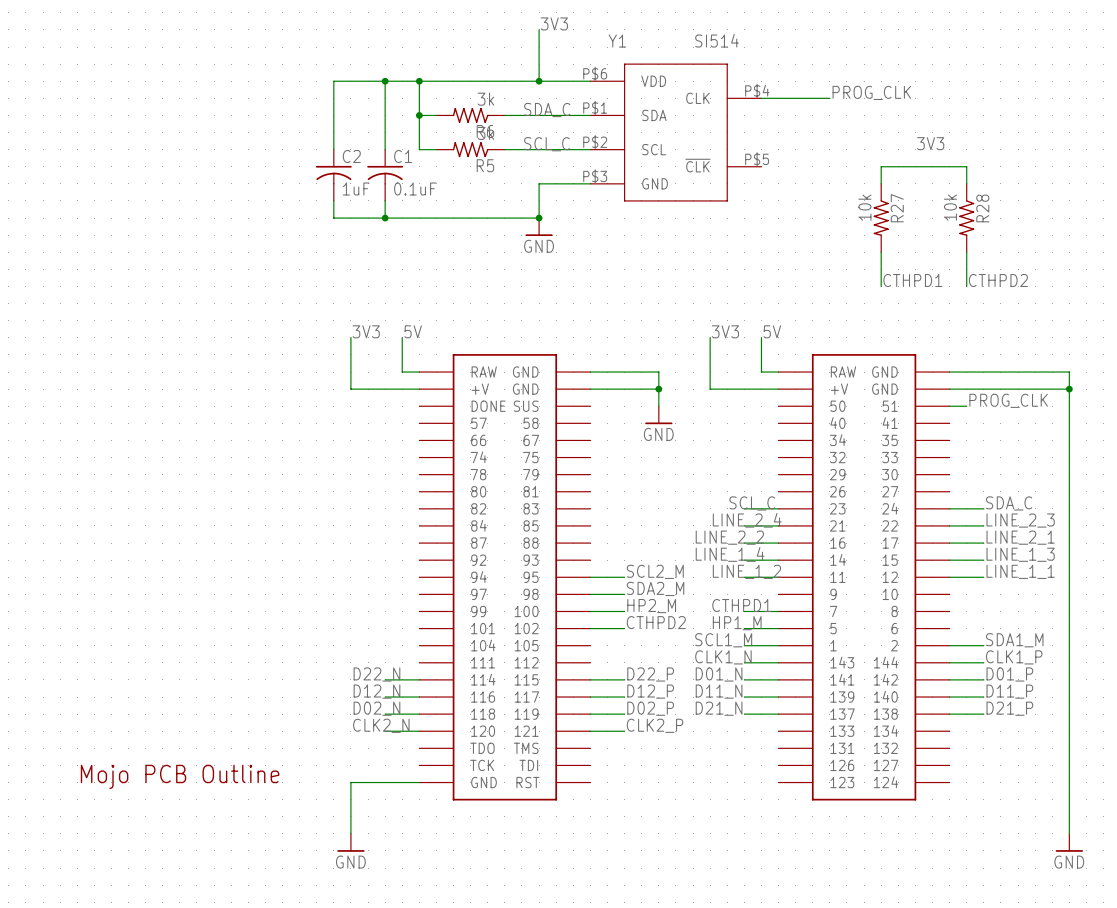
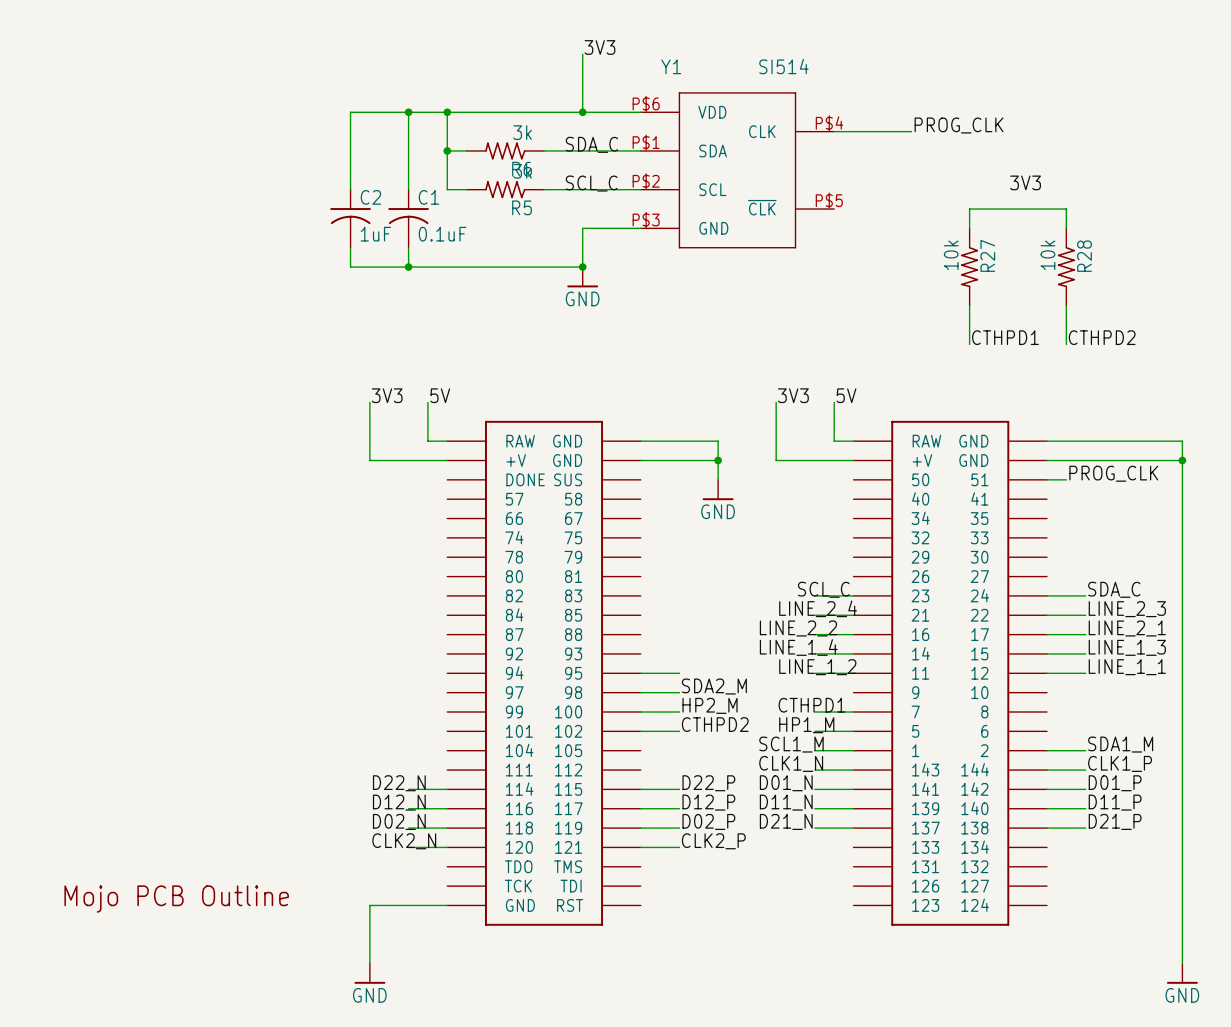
label: SCL2_M (655, 571) -> none

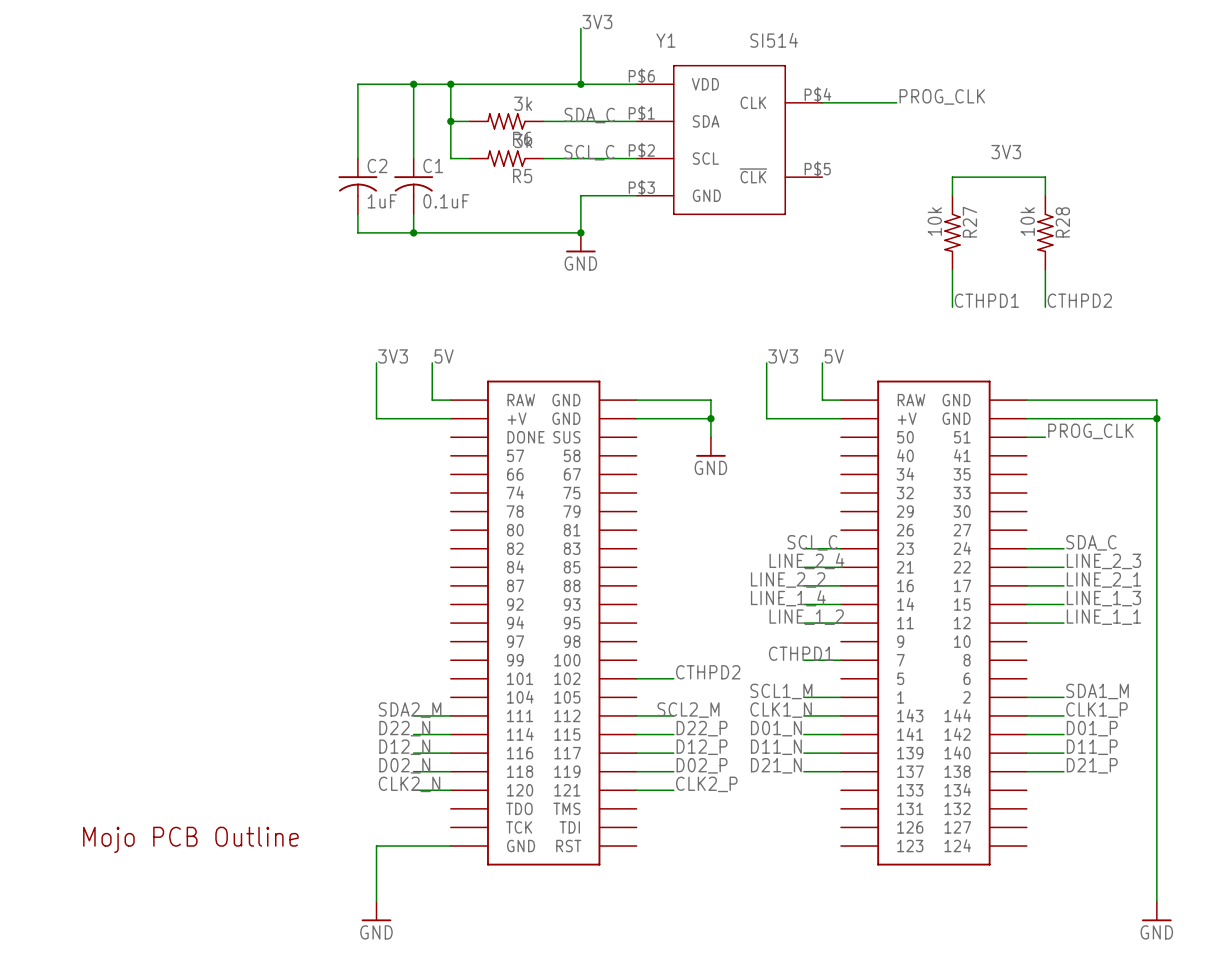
wire: (640, 673) (679, 673) -> none
label: SDA2_M (714, 686) -> none
wire: (640, 692) (679, 692) -> none
label: HP2_M (710, 705) -> none
wire: (640, 712) (679, 712) -> (636, 715) (673, 715)
label: HP1_M (806, 725) -> none
wire: (814, 731) (853, 731) -> none
label: none -> SDA2_M (410, 710)
label: none -> SCL2_M (688, 710)
wire: none -> (413, 715) (450, 715)

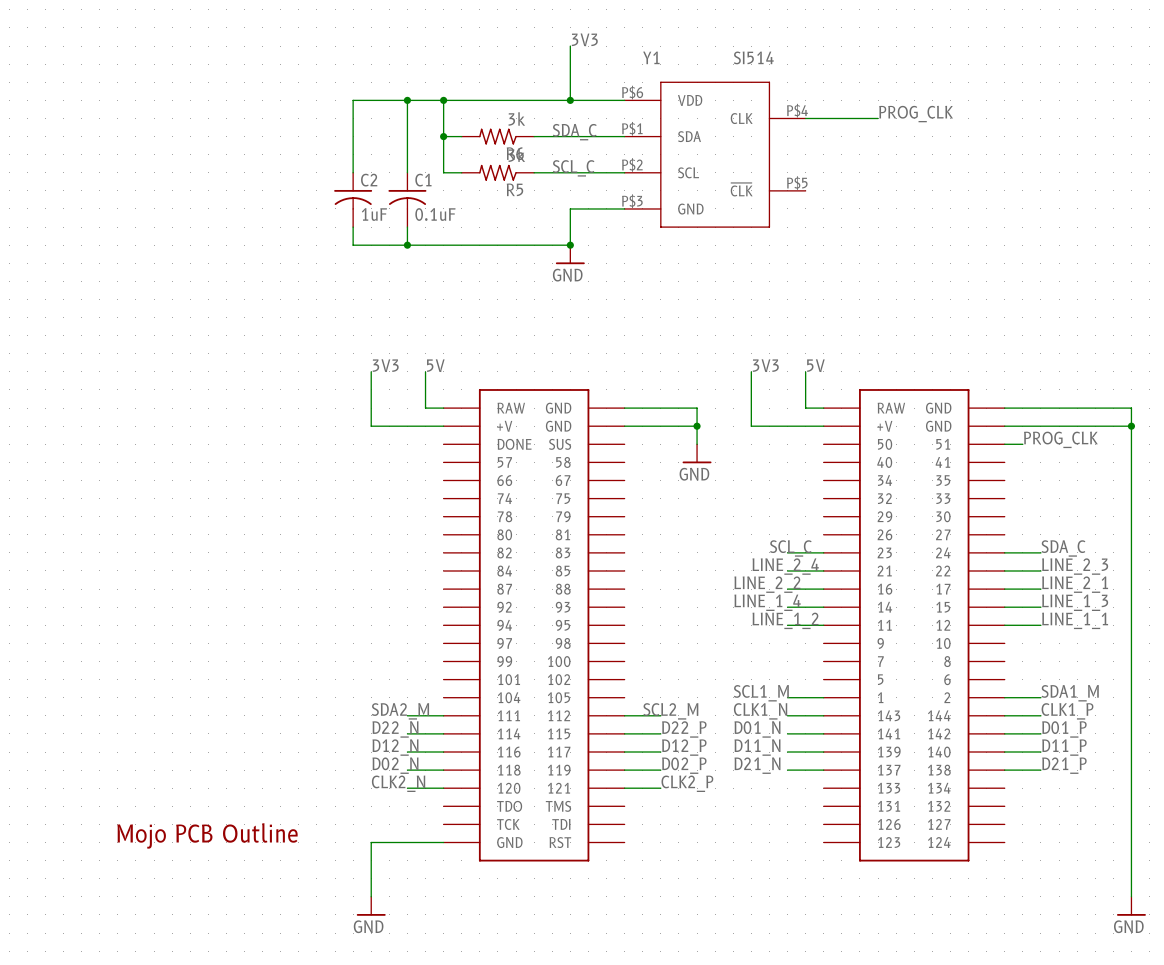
label: 3V3 (1006, 152) -> none
wire: (952, 195) (952, 177) (1045, 177) (1045, 195) -> none
R27: 10k (952, 232) -> none
R28: 10k (1045, 232) -> none
wire: (952, 270) (952, 307) -> none
wire: (1045, 270) (1045, 307) -> none
label: CTHPD1 (986, 300) -> none
label: CTHPD2 (1079, 300) -> none
label: CTHPD1 (801, 653) -> none
wire: (803, 660) (841, 660) -> none
label: CTHPD2 (708, 672) -> none
wire: (636, 678) (673, 678) -> none

